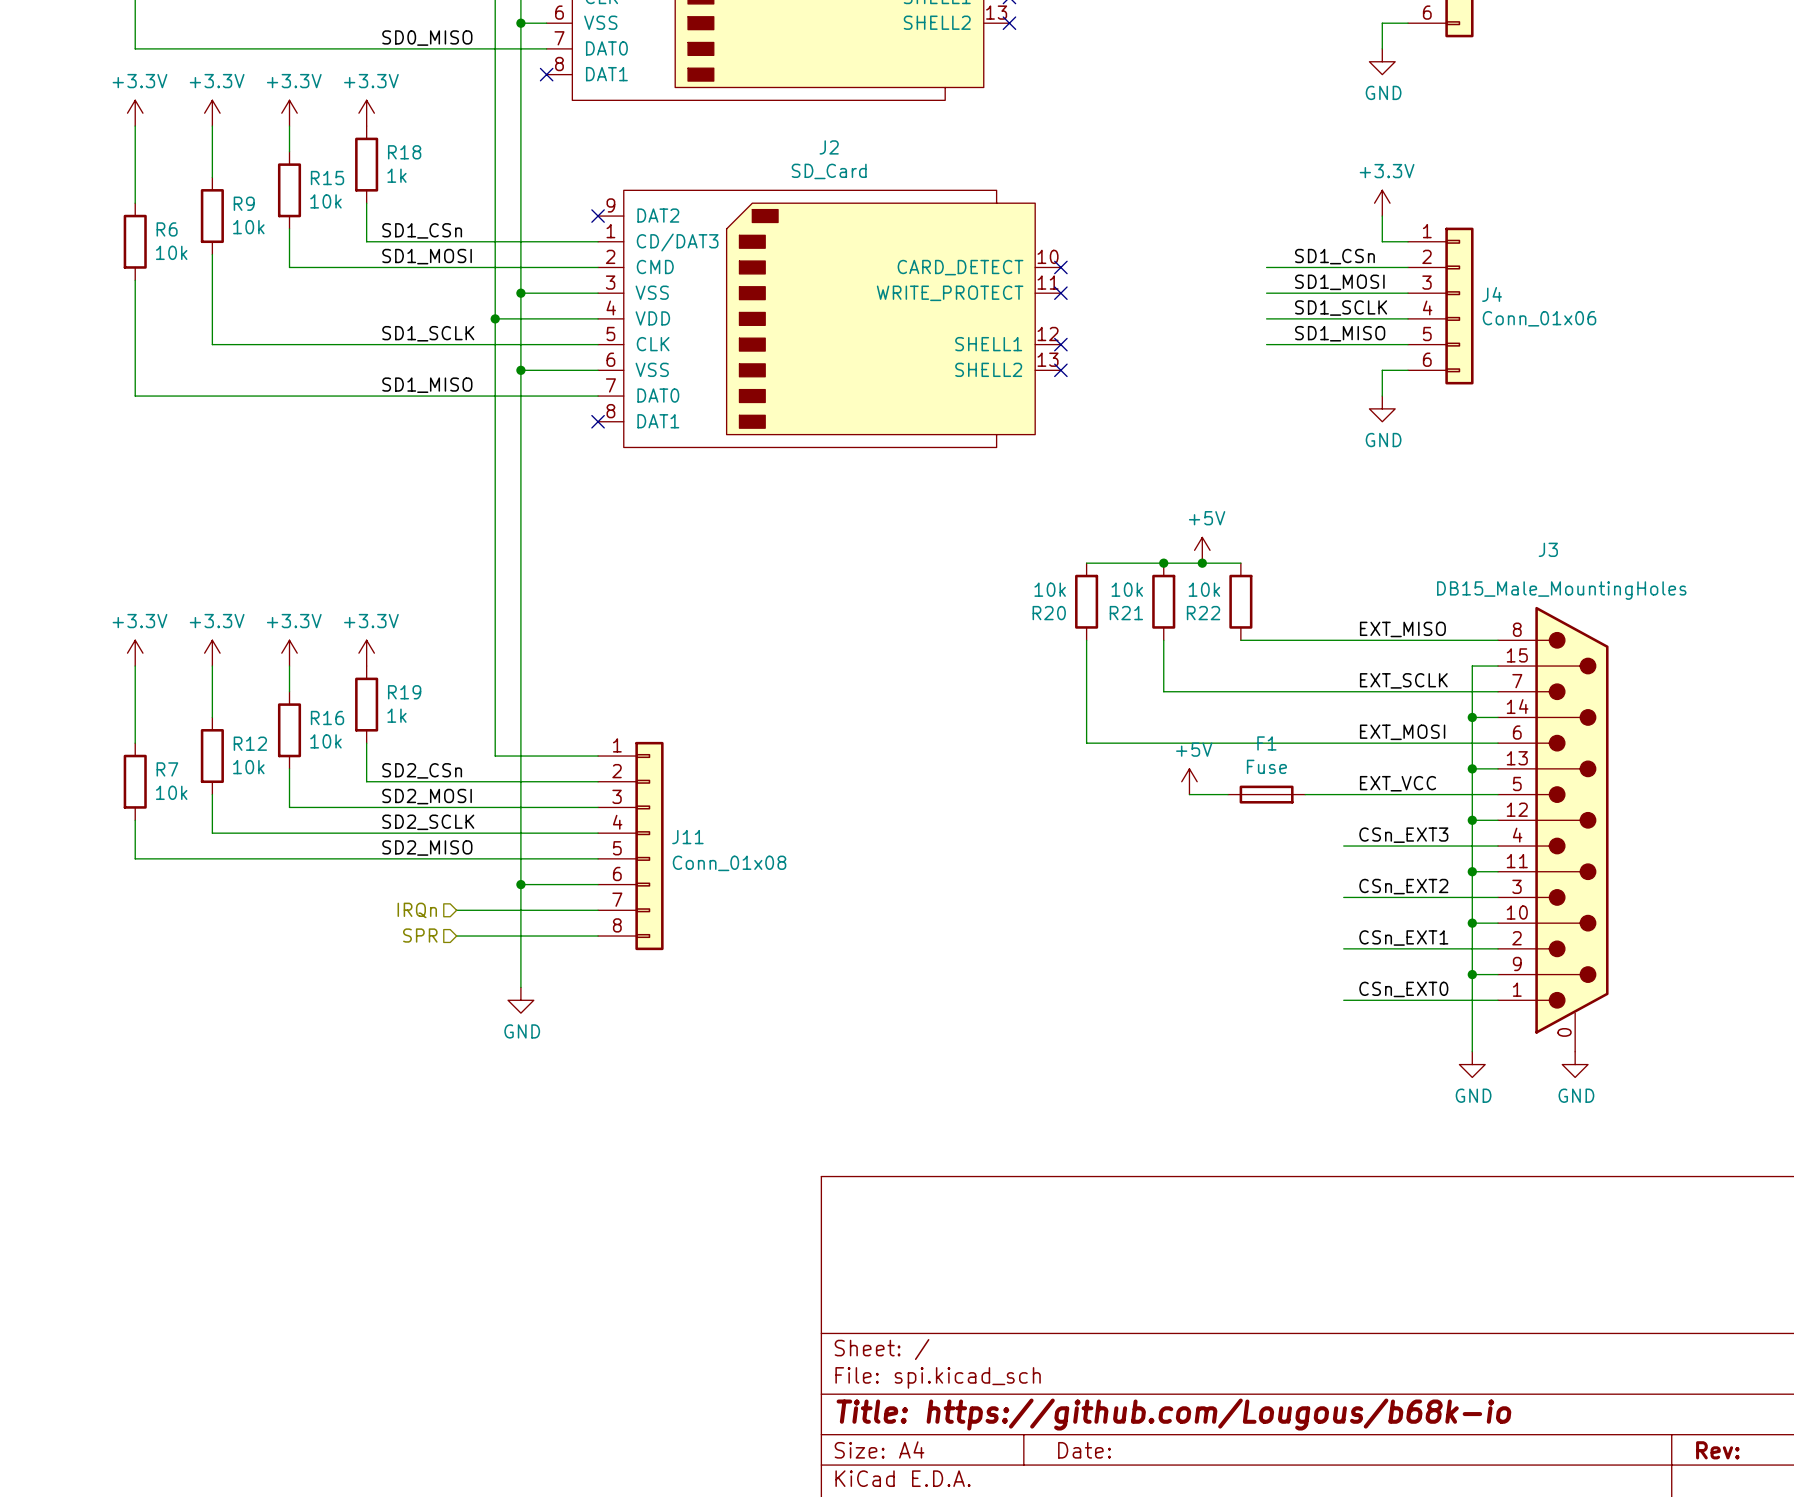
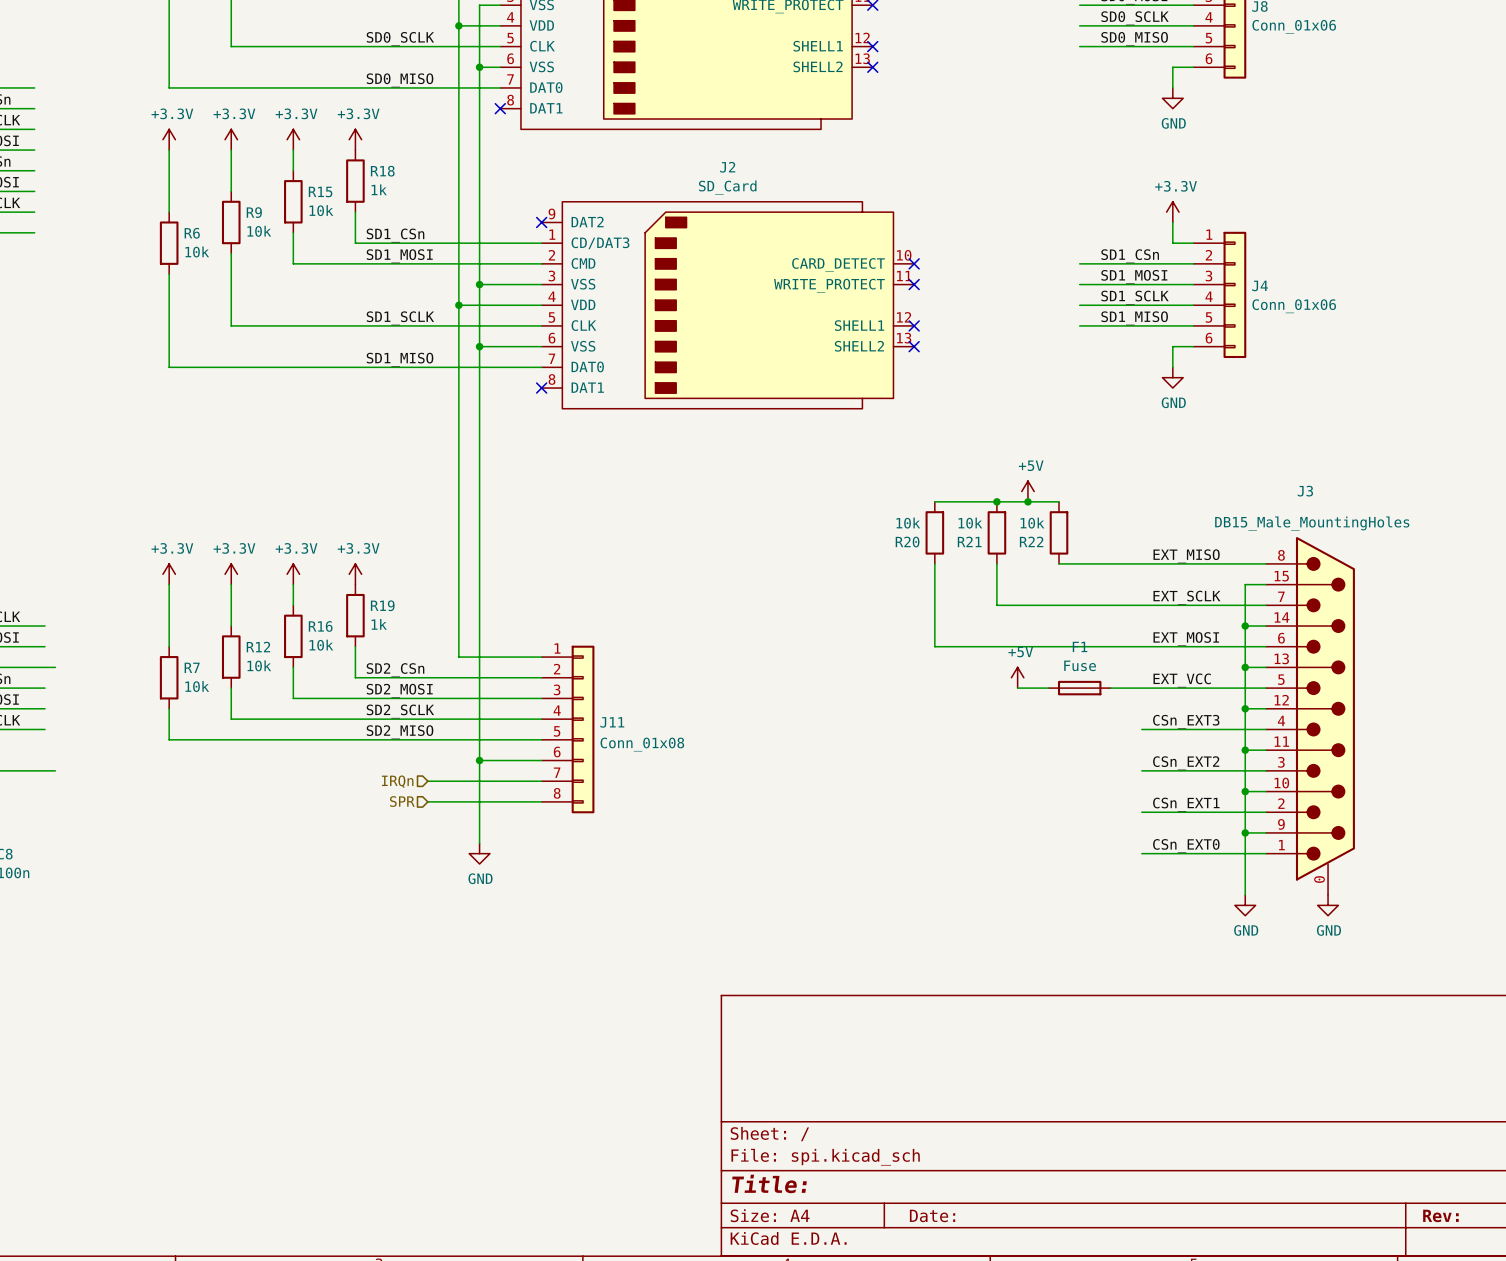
title block: Title: https://github.com/Lougous/b68k-io (1173, 1414) -> Title: (769, 1183)

